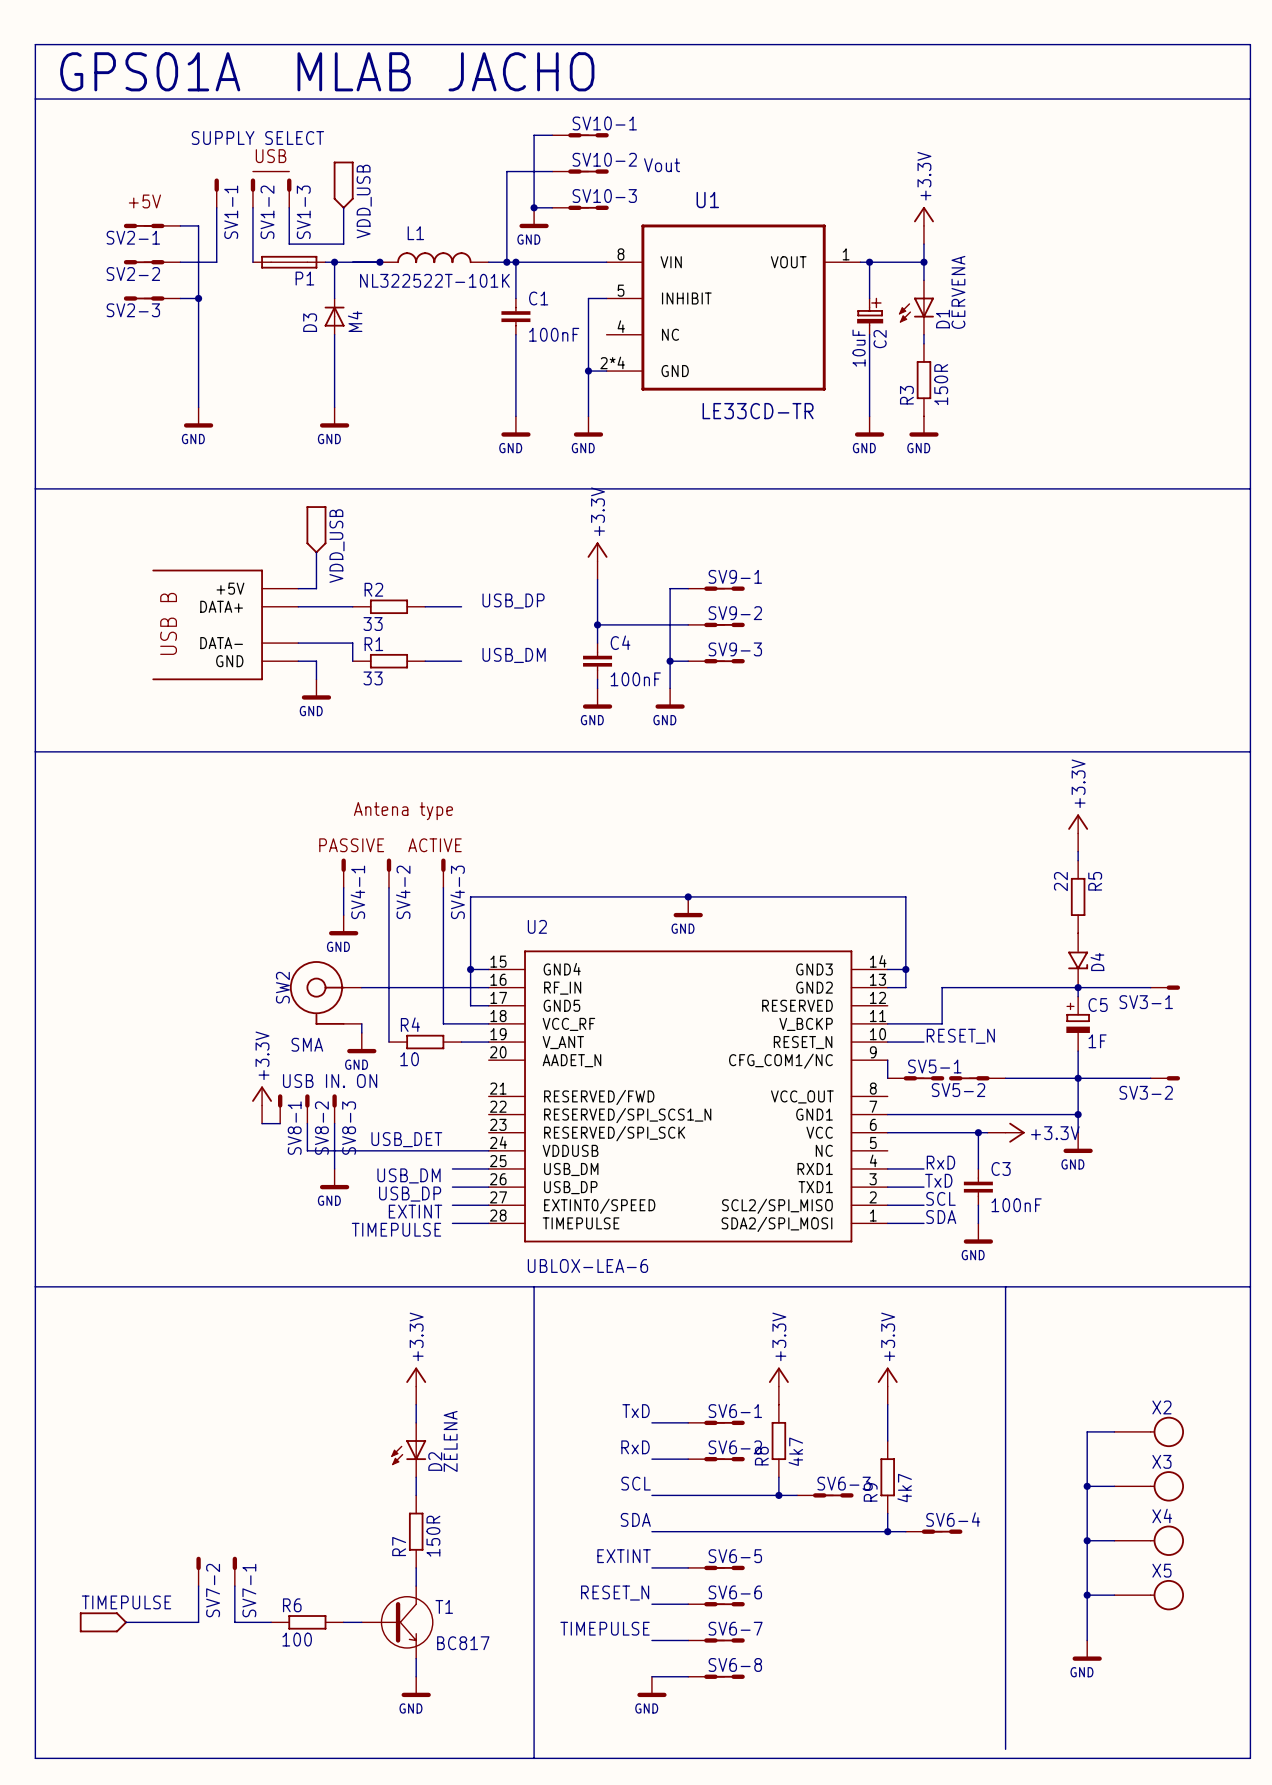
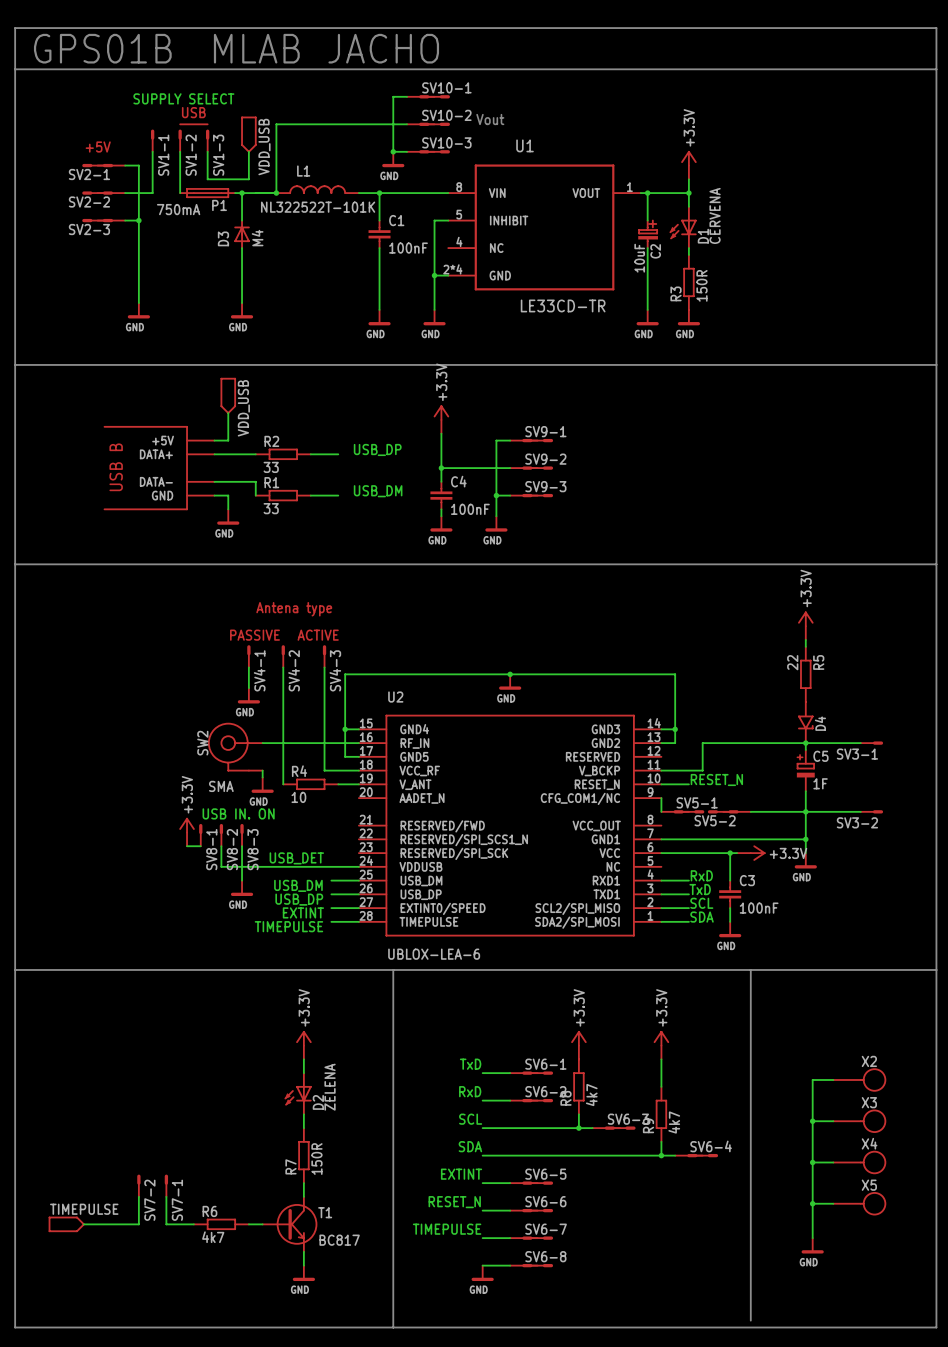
text: GPS01A (150, 71) -> GPS01B (102, 48)
wire: (506, 171) (506, 262) -> (372, 124) (276, 124) (276, 193)
junction: (506, 262) -> none
P1 value: none -> 750mA (178, 209)
R6 value: 100 (297, 1639) -> 4k7 (213, 1237)

